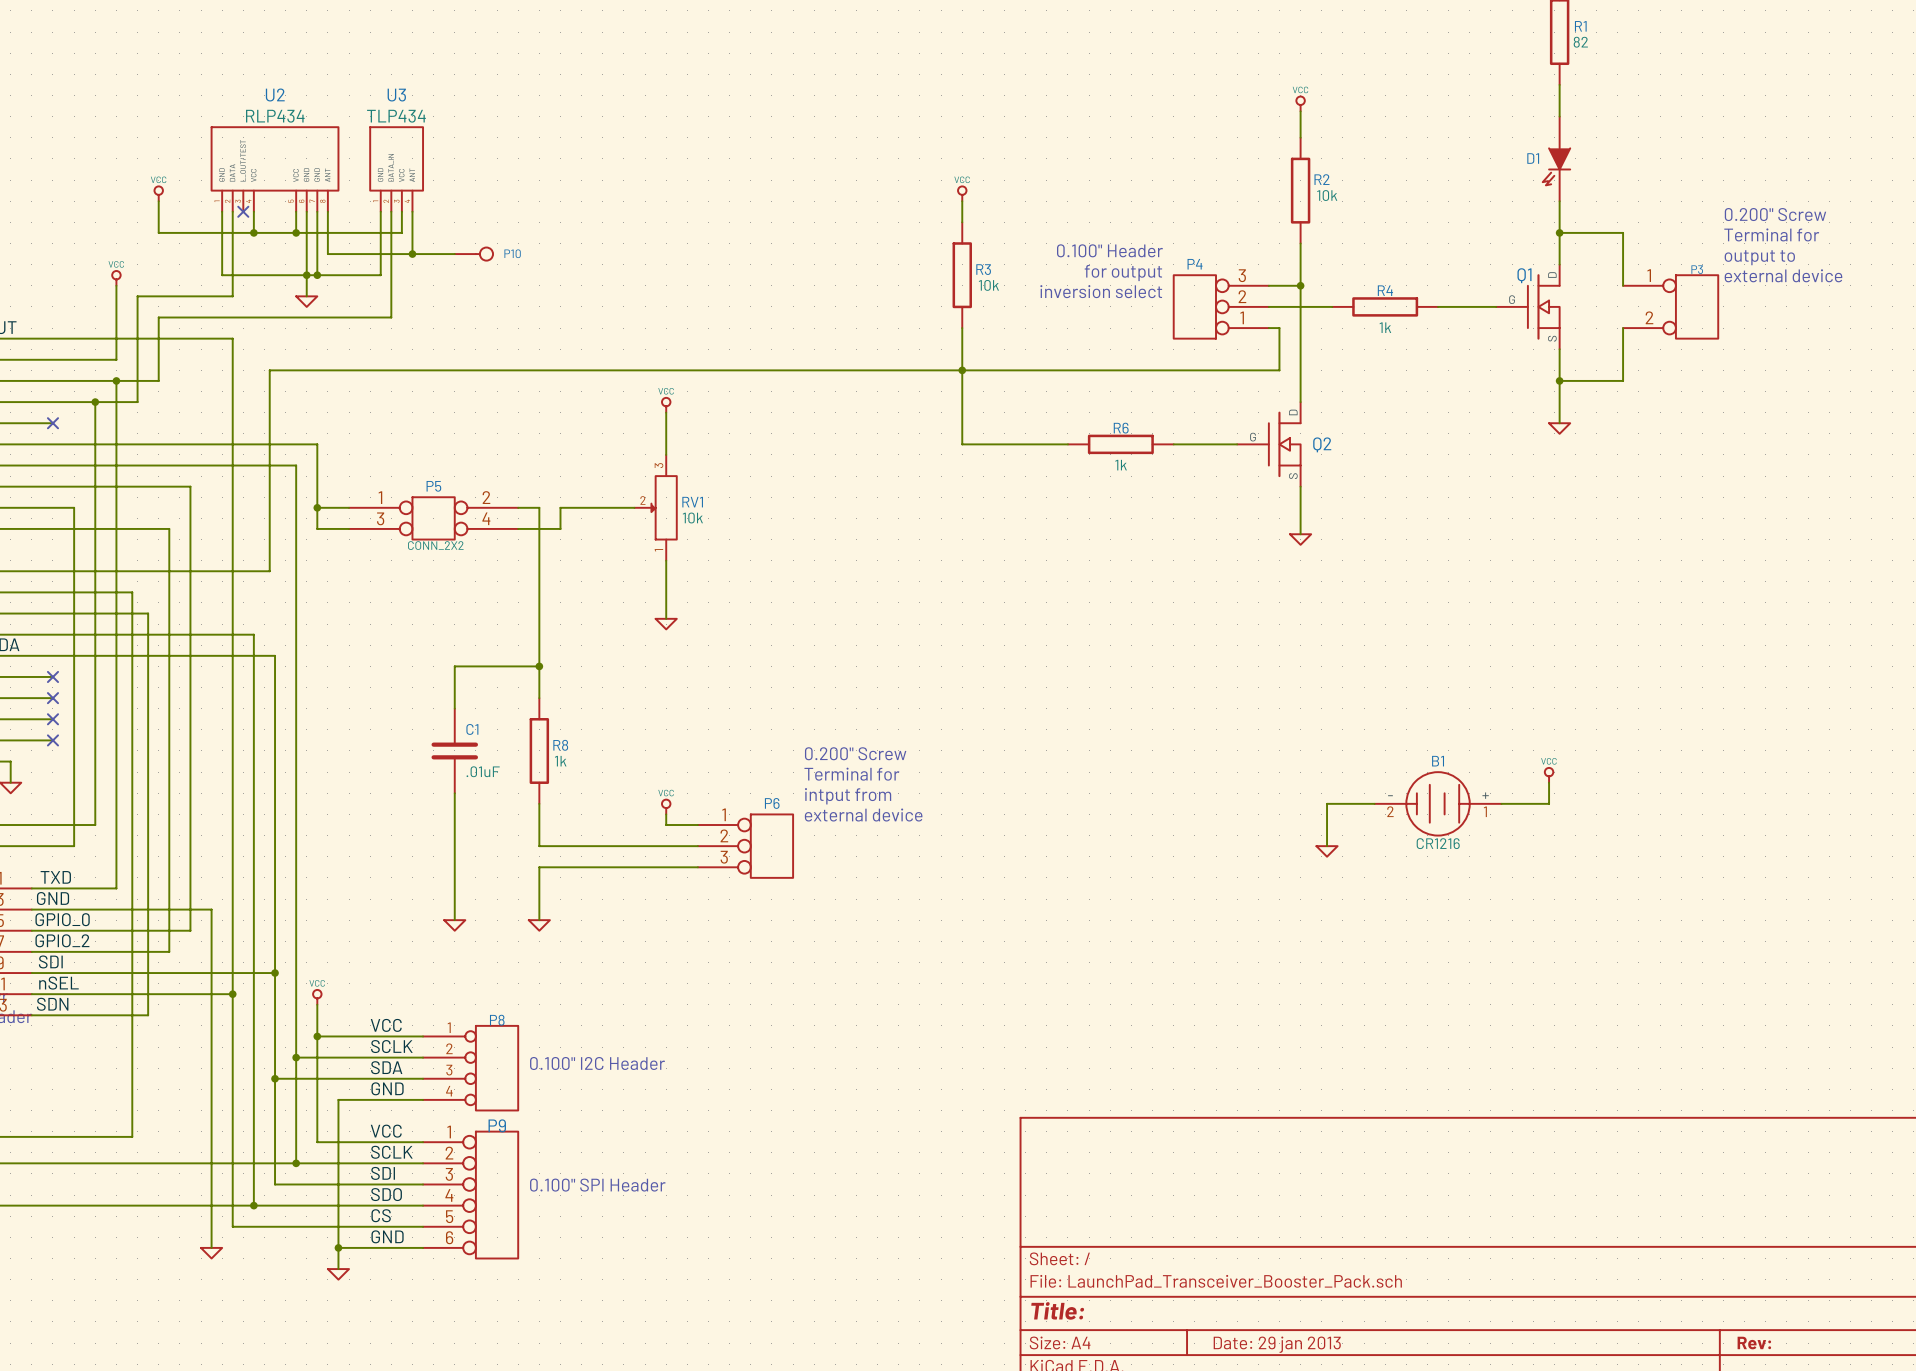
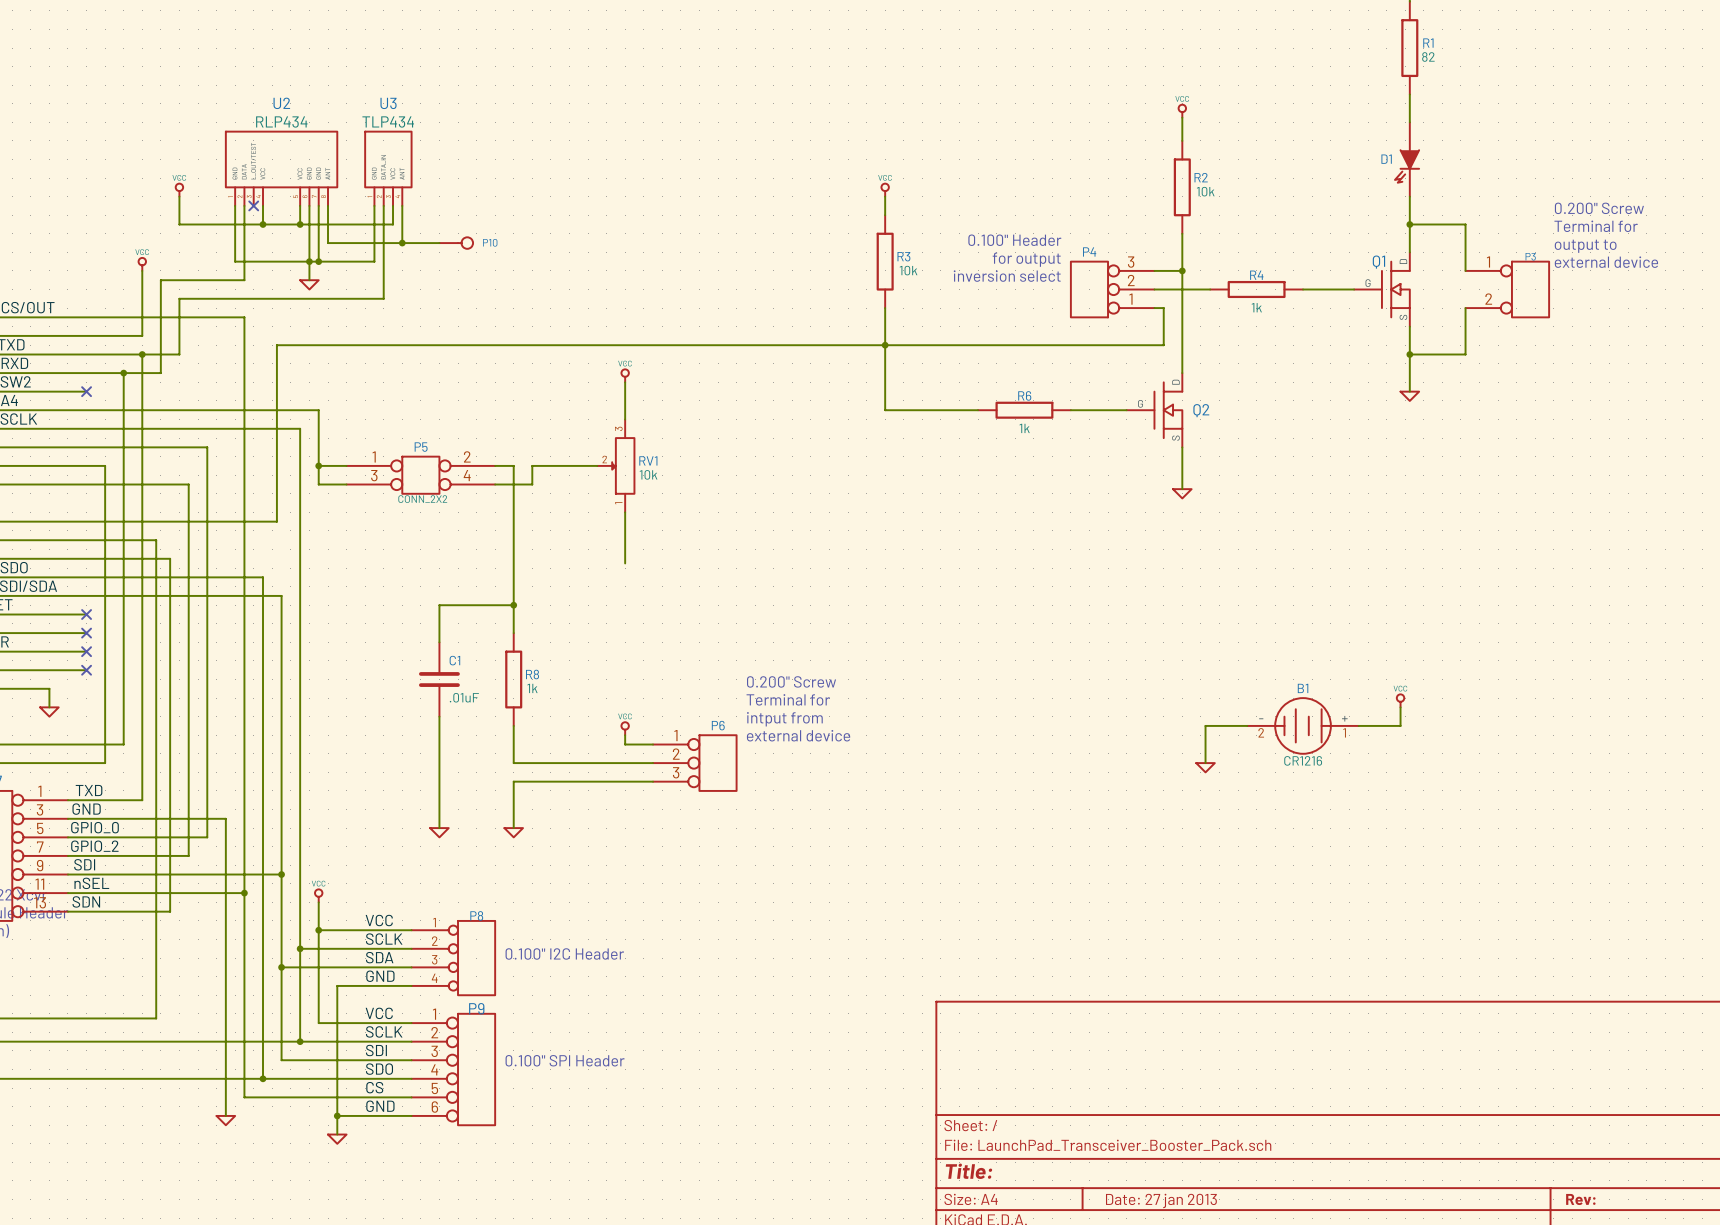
power symbol: (666, 624) -> none
title block: Date: 29 jan 2013 (1277, 1344) -> Date: 27 jan 2013 (1161, 1200)

